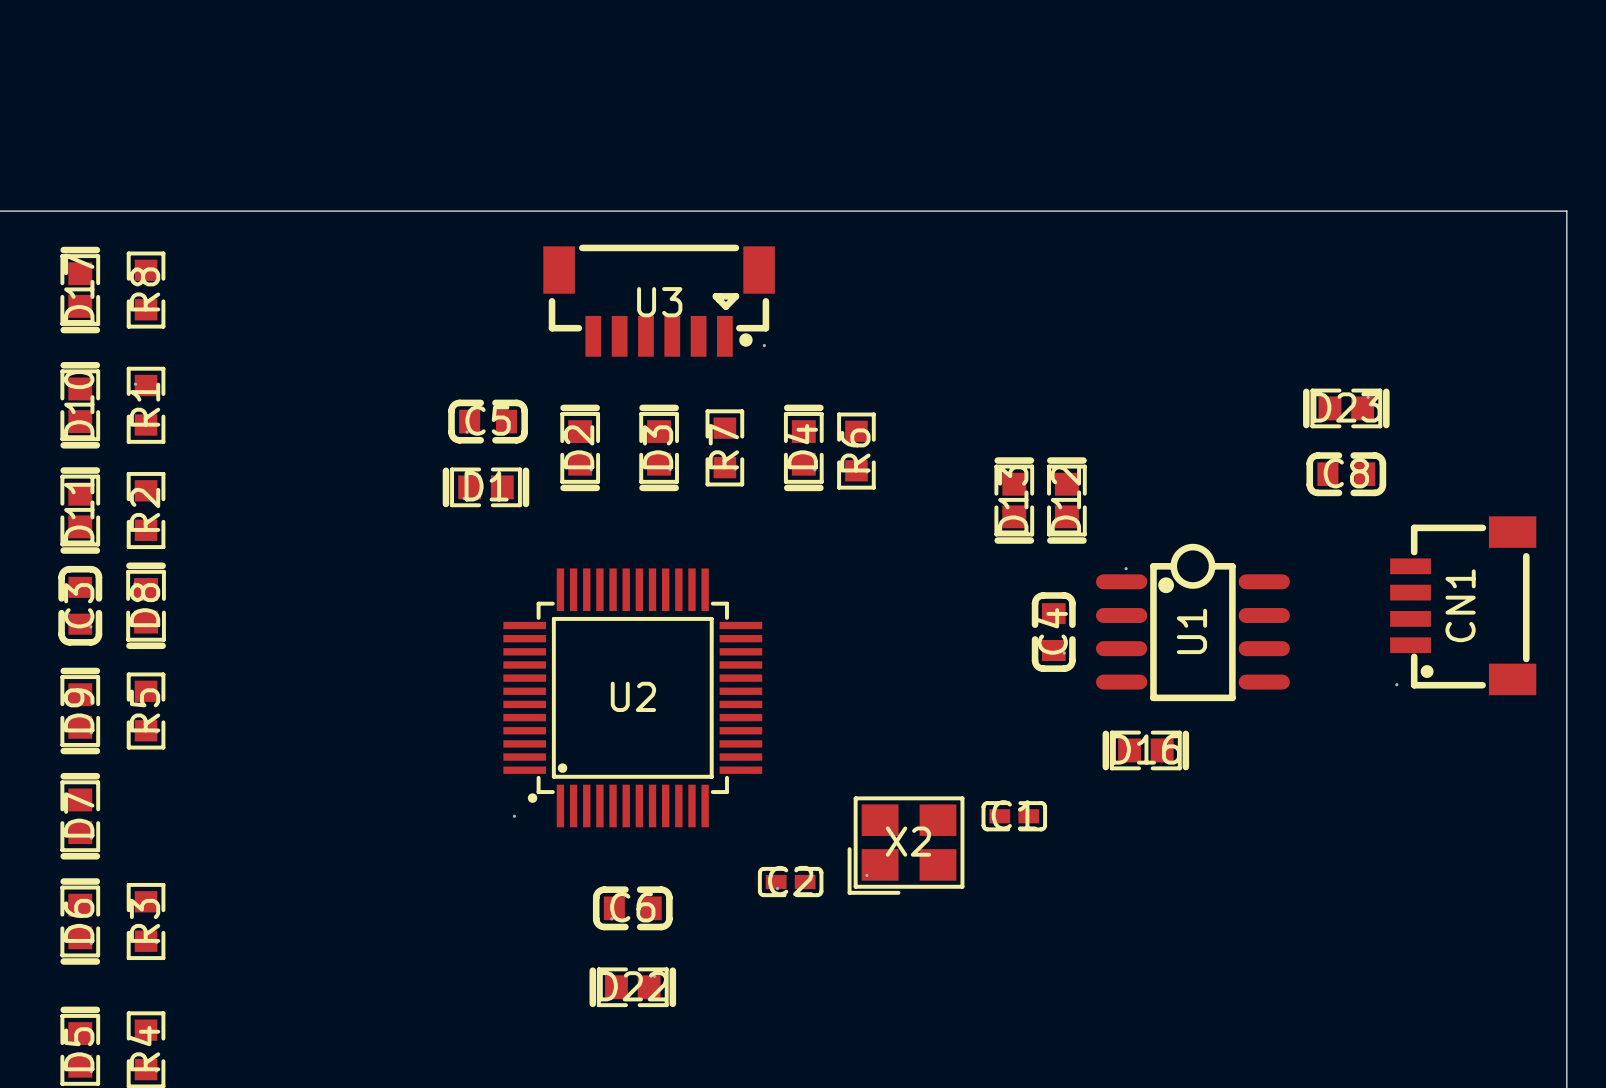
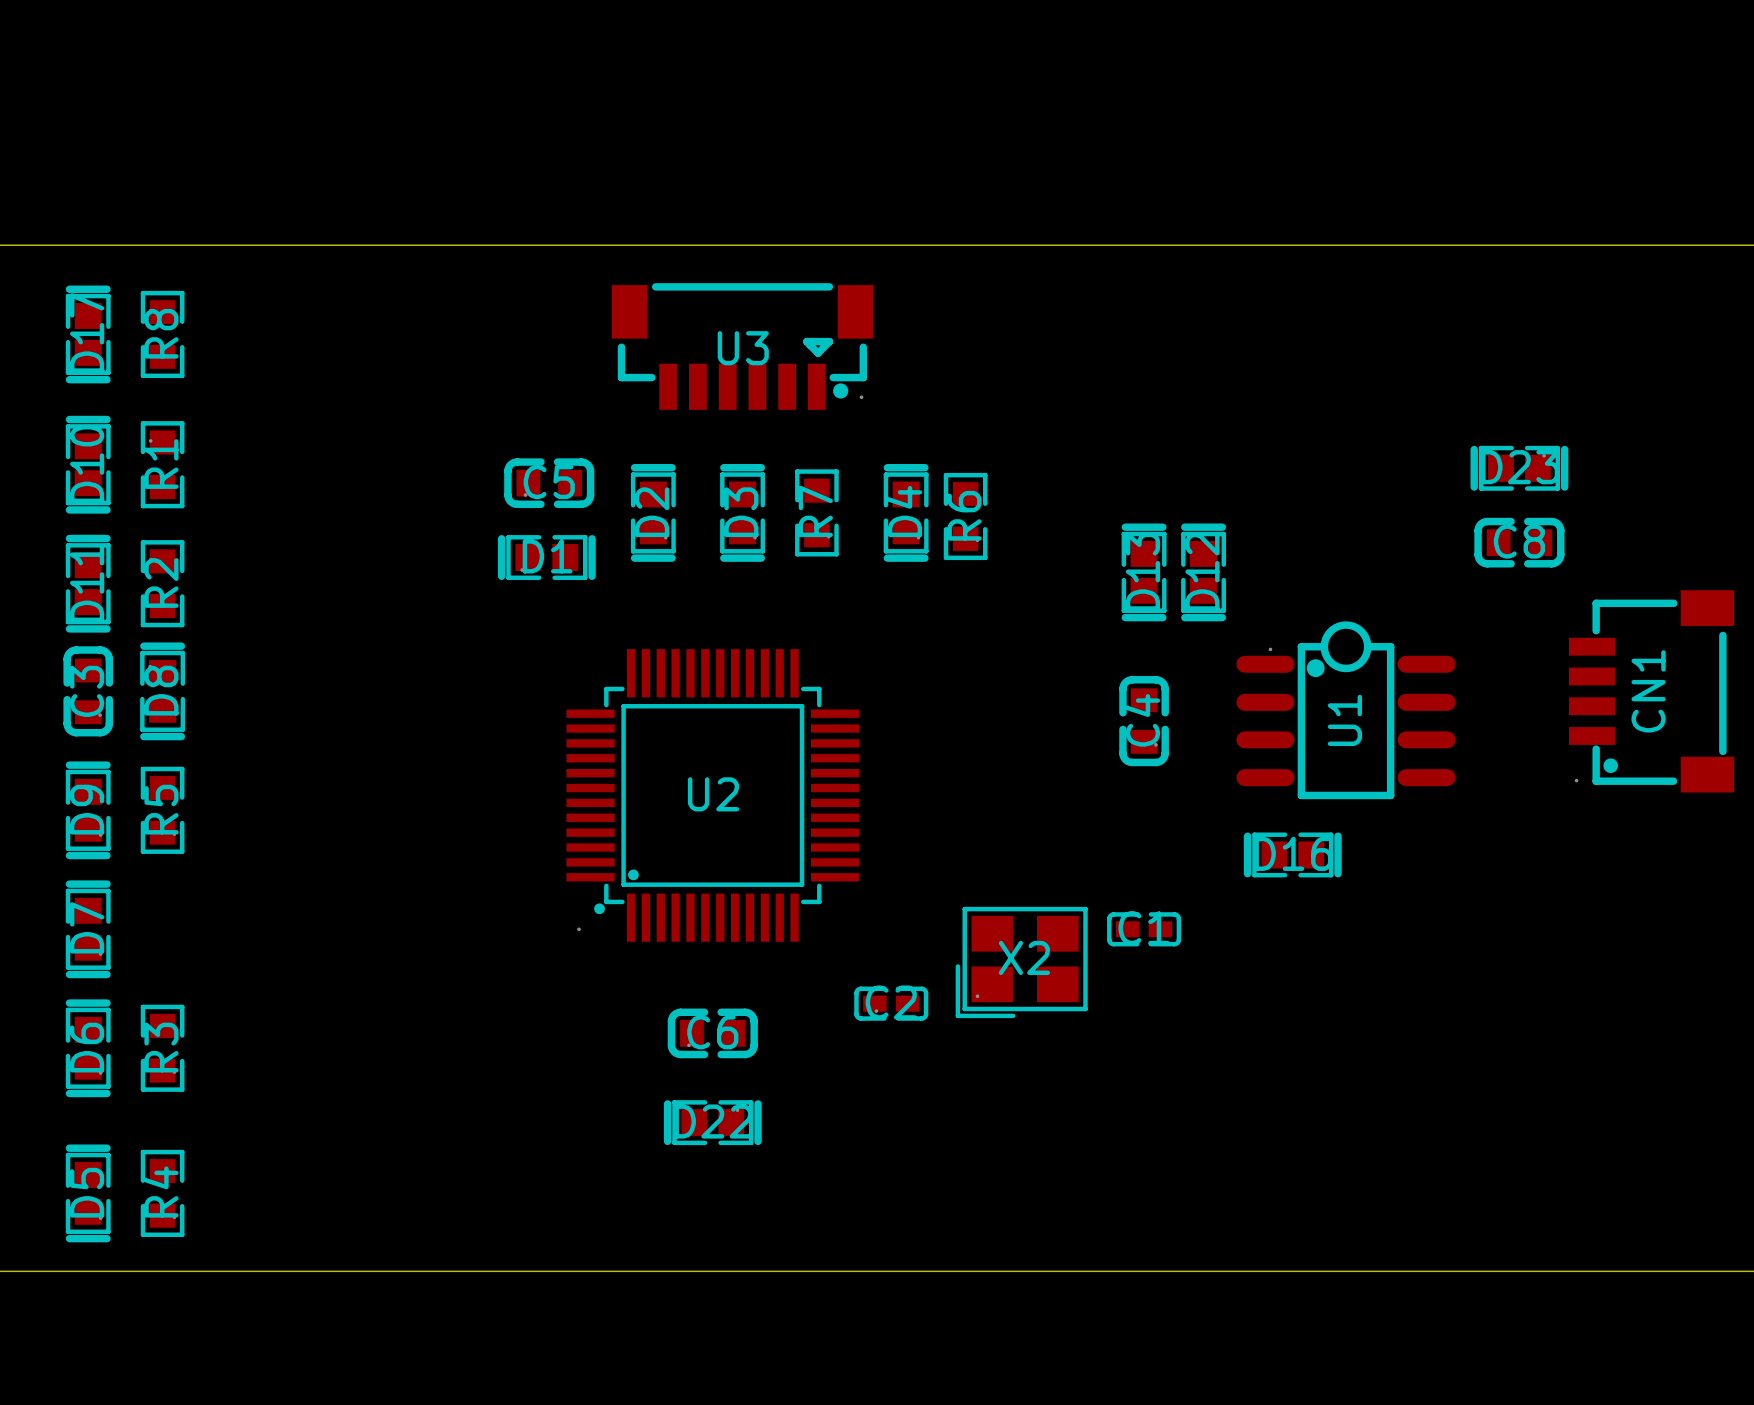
C4 position: (1053, 632) -> (1144, 721)

